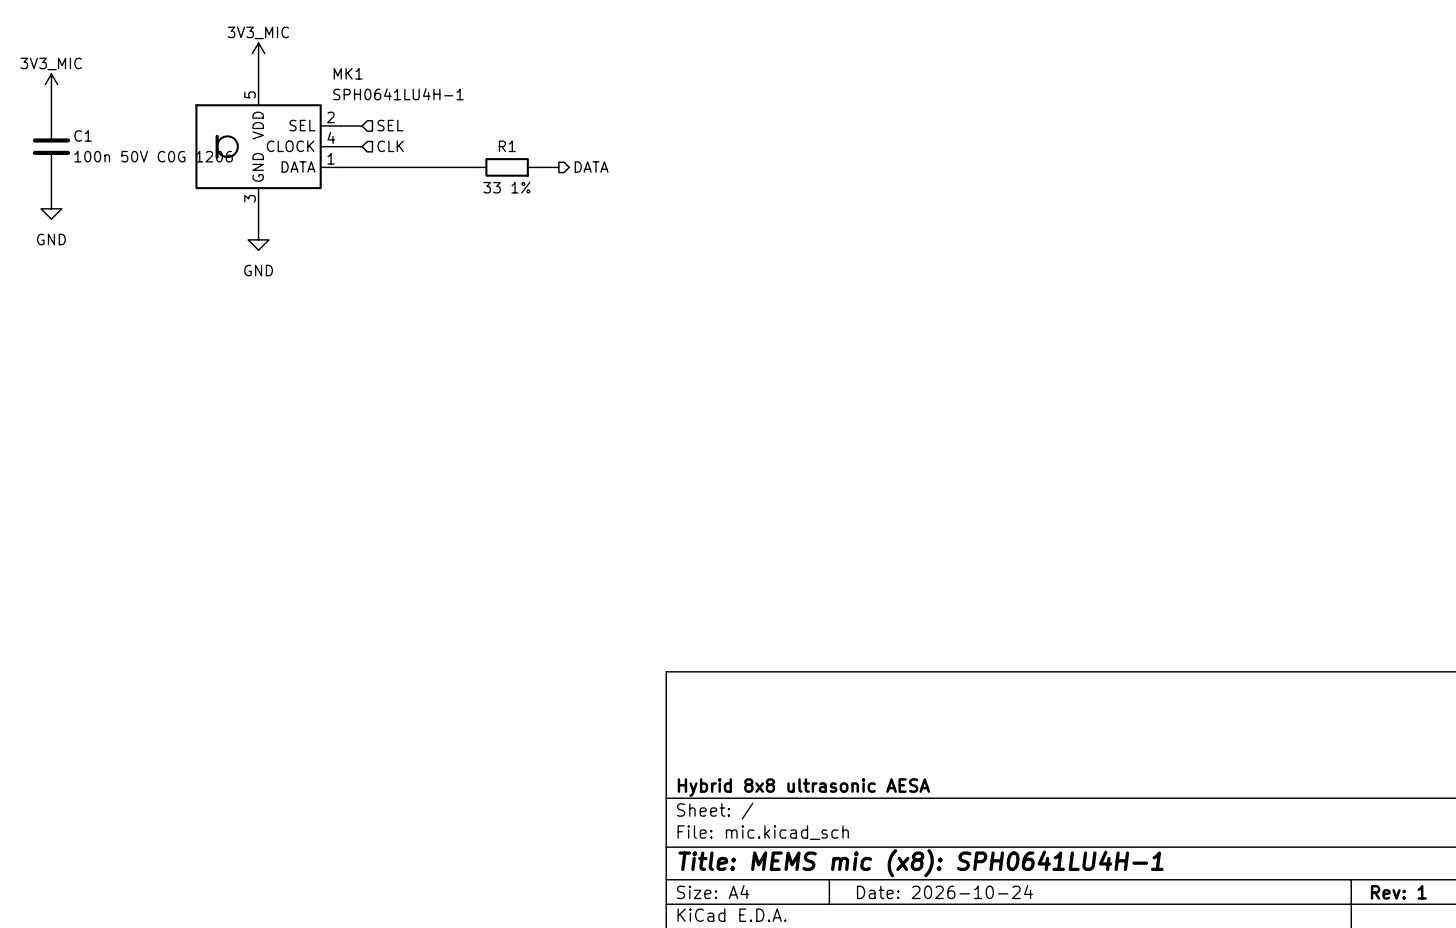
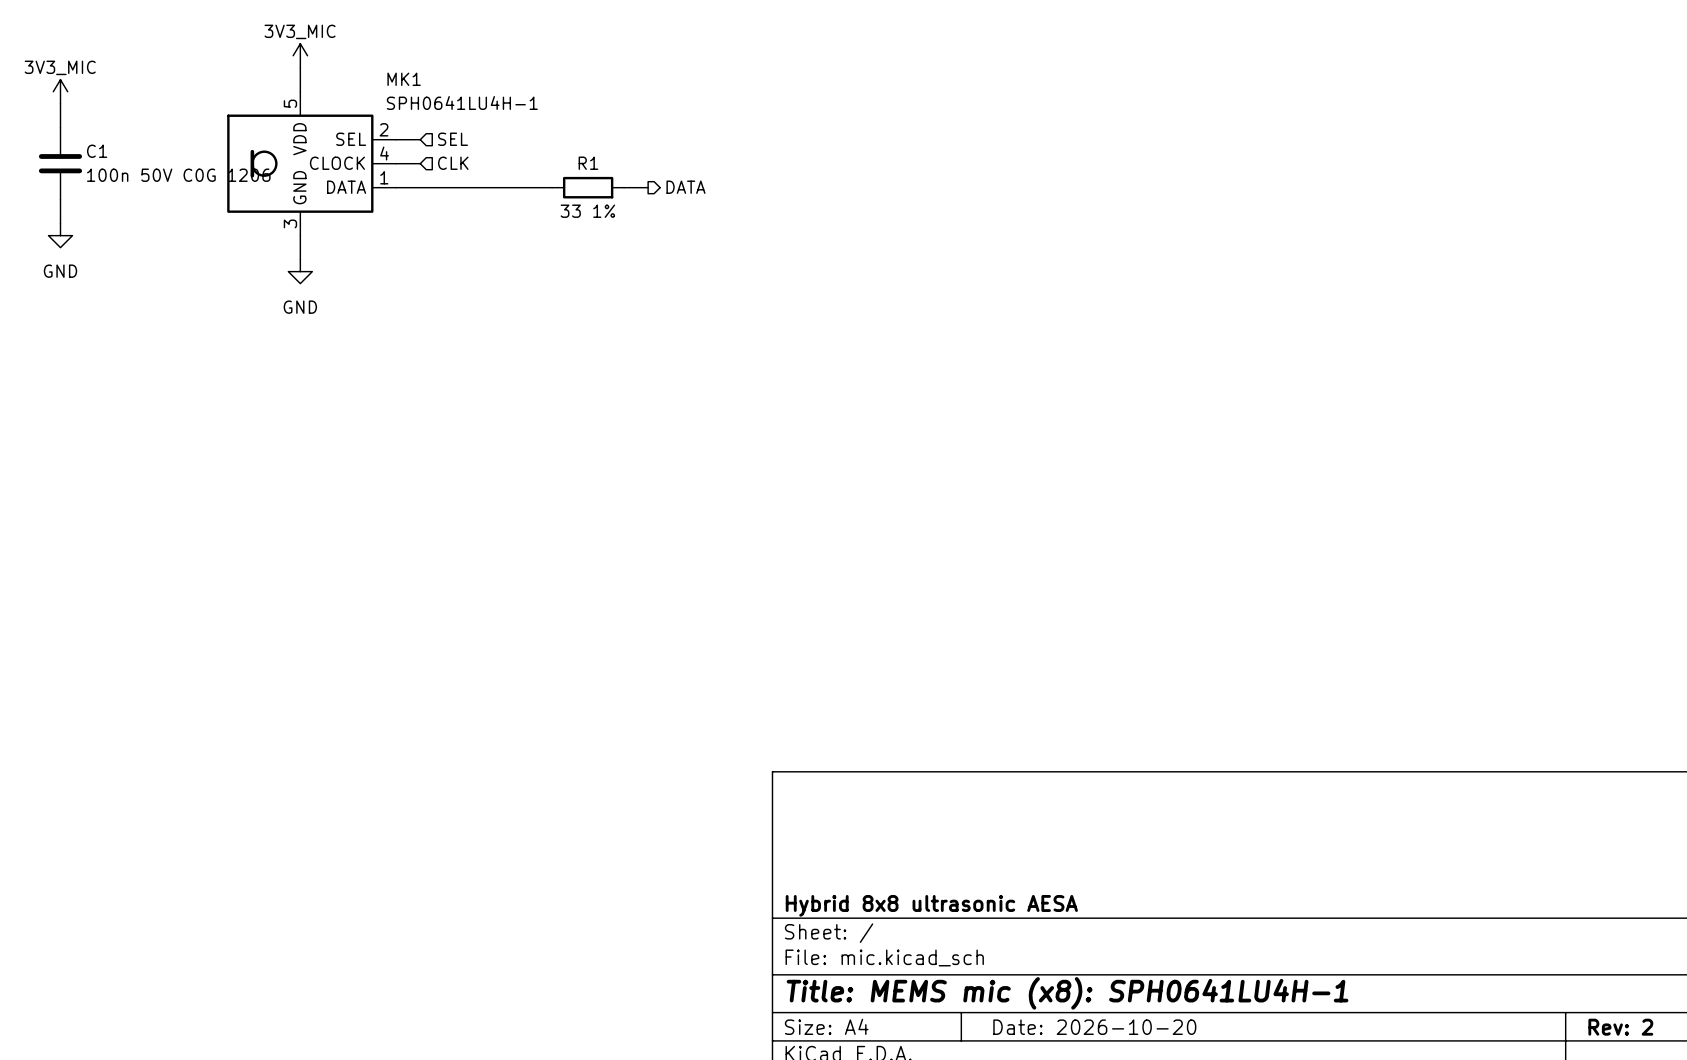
title block: Date: 2026-10-24 (944, 892) -> Date: 2026-10-20 (1094, 1027)
title block: Rev: 1 (1398, 892) -> Rev: 2 (1620, 1027)

